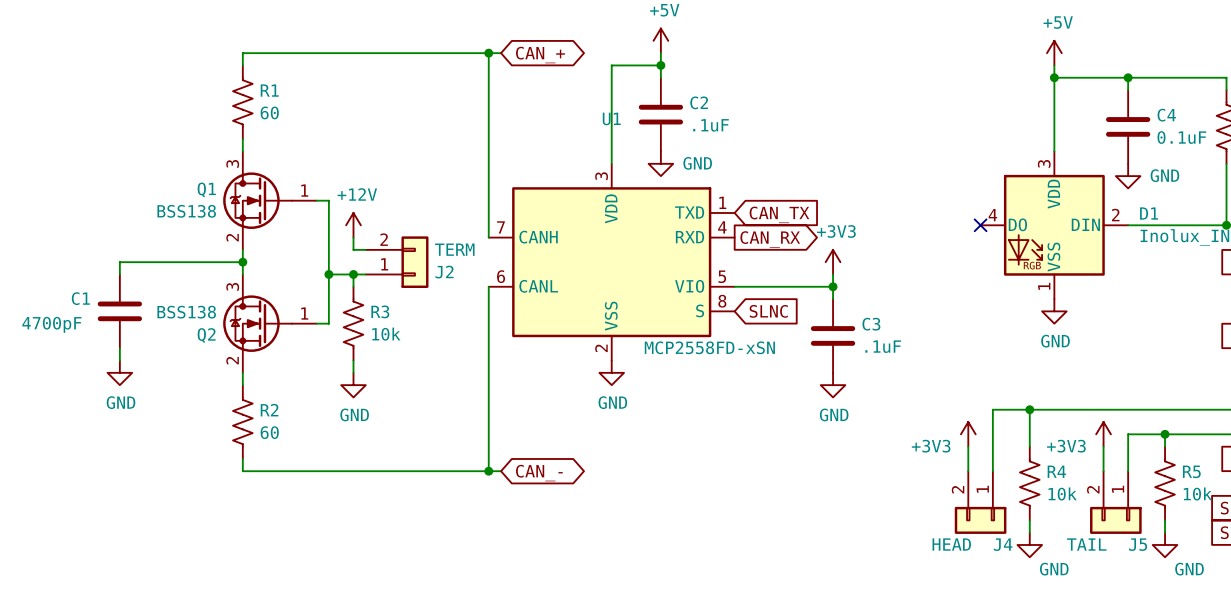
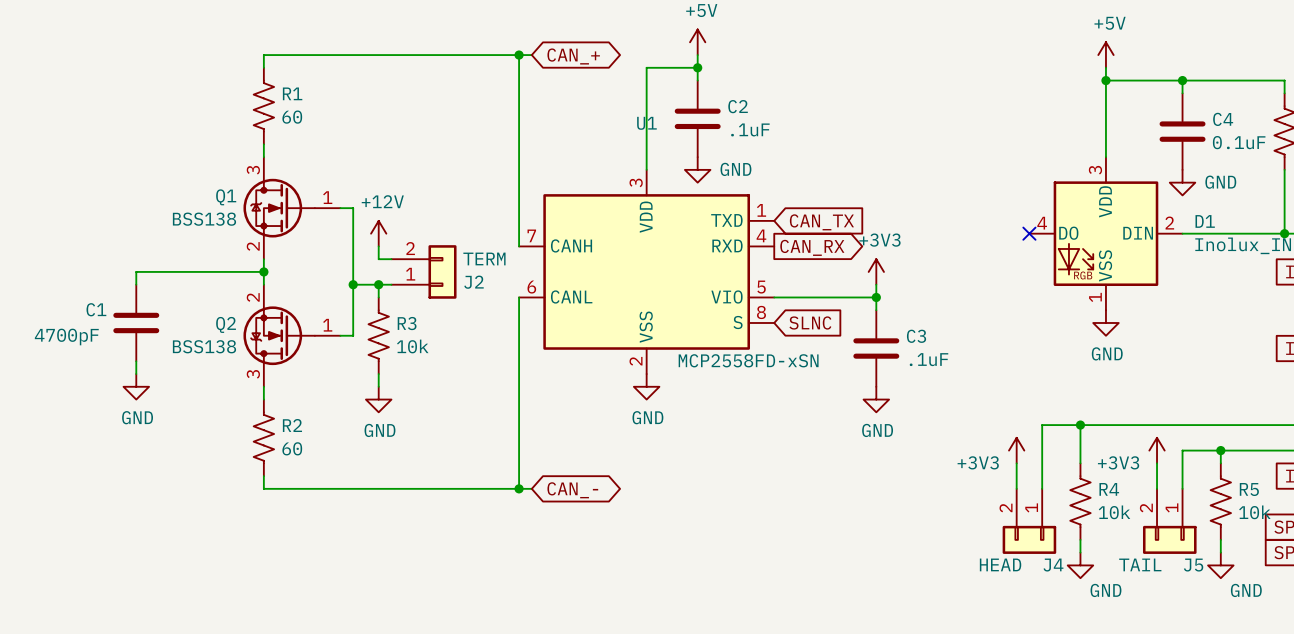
Q2 flip: as is (257, 323) -> up-down (279, 335)

